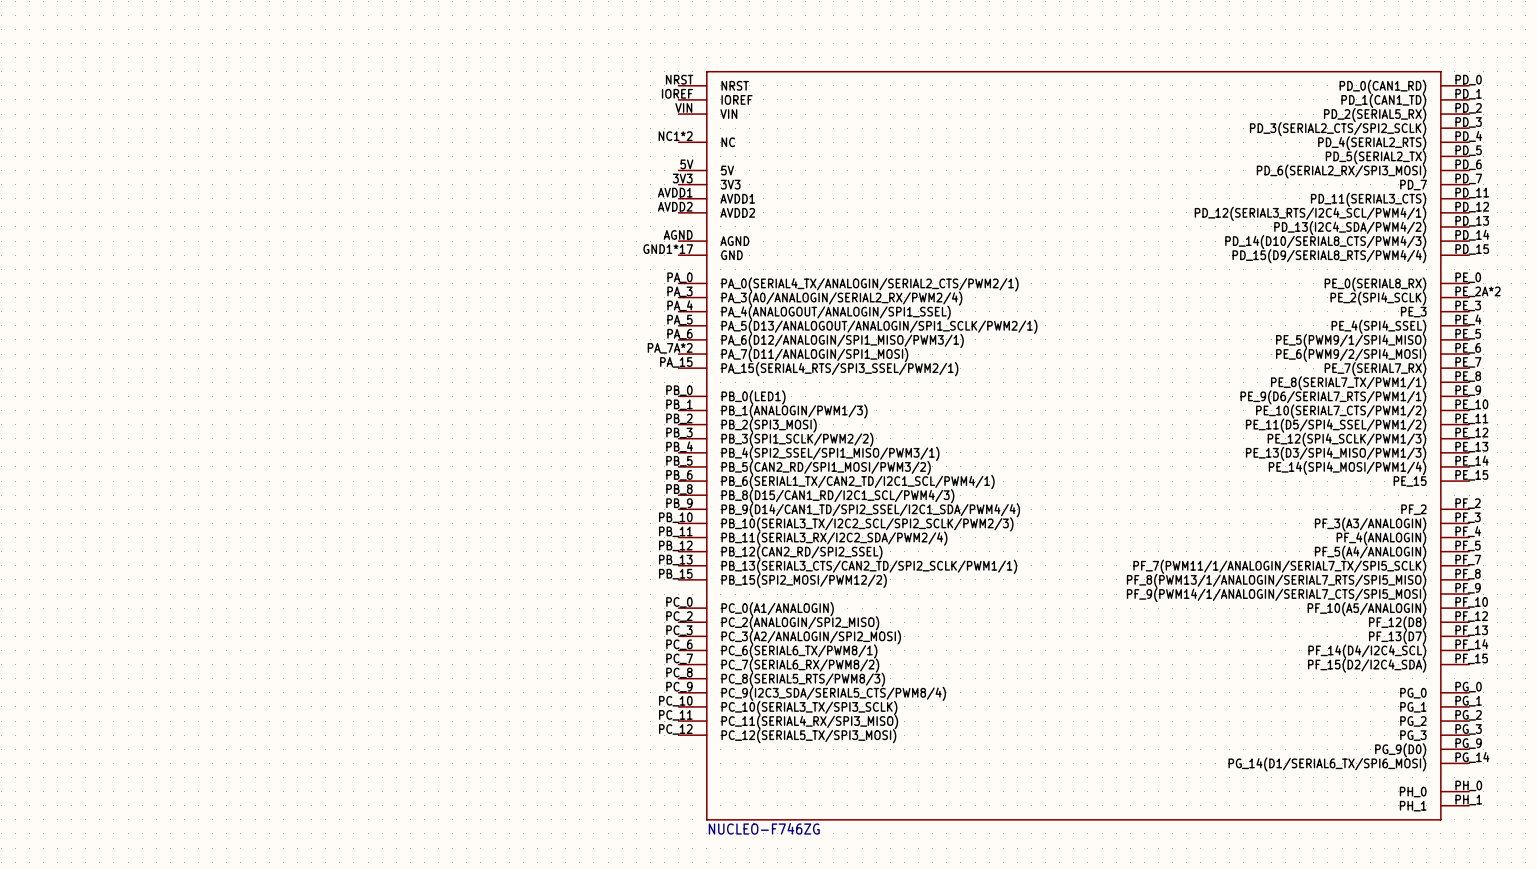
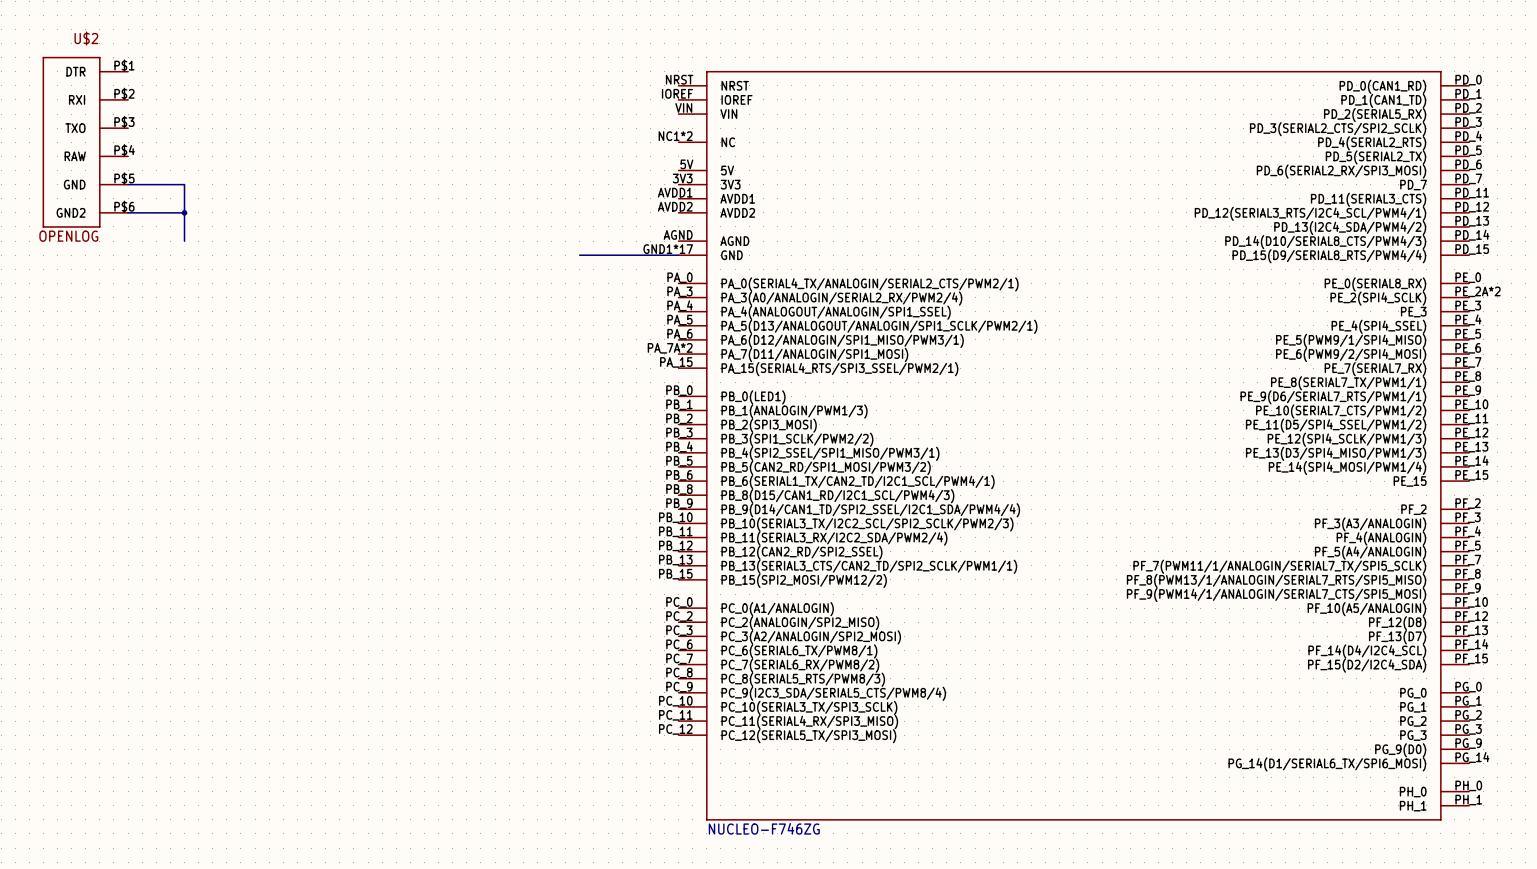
U$2: none -> OPENLOG (85, 142)
wire: none -> (128, 184) (184, 184) (184, 241)
wire: none -> (128, 212) (184, 212)
junction: none -> (184, 212)
wire: none -> (579, 255) (678, 255)

